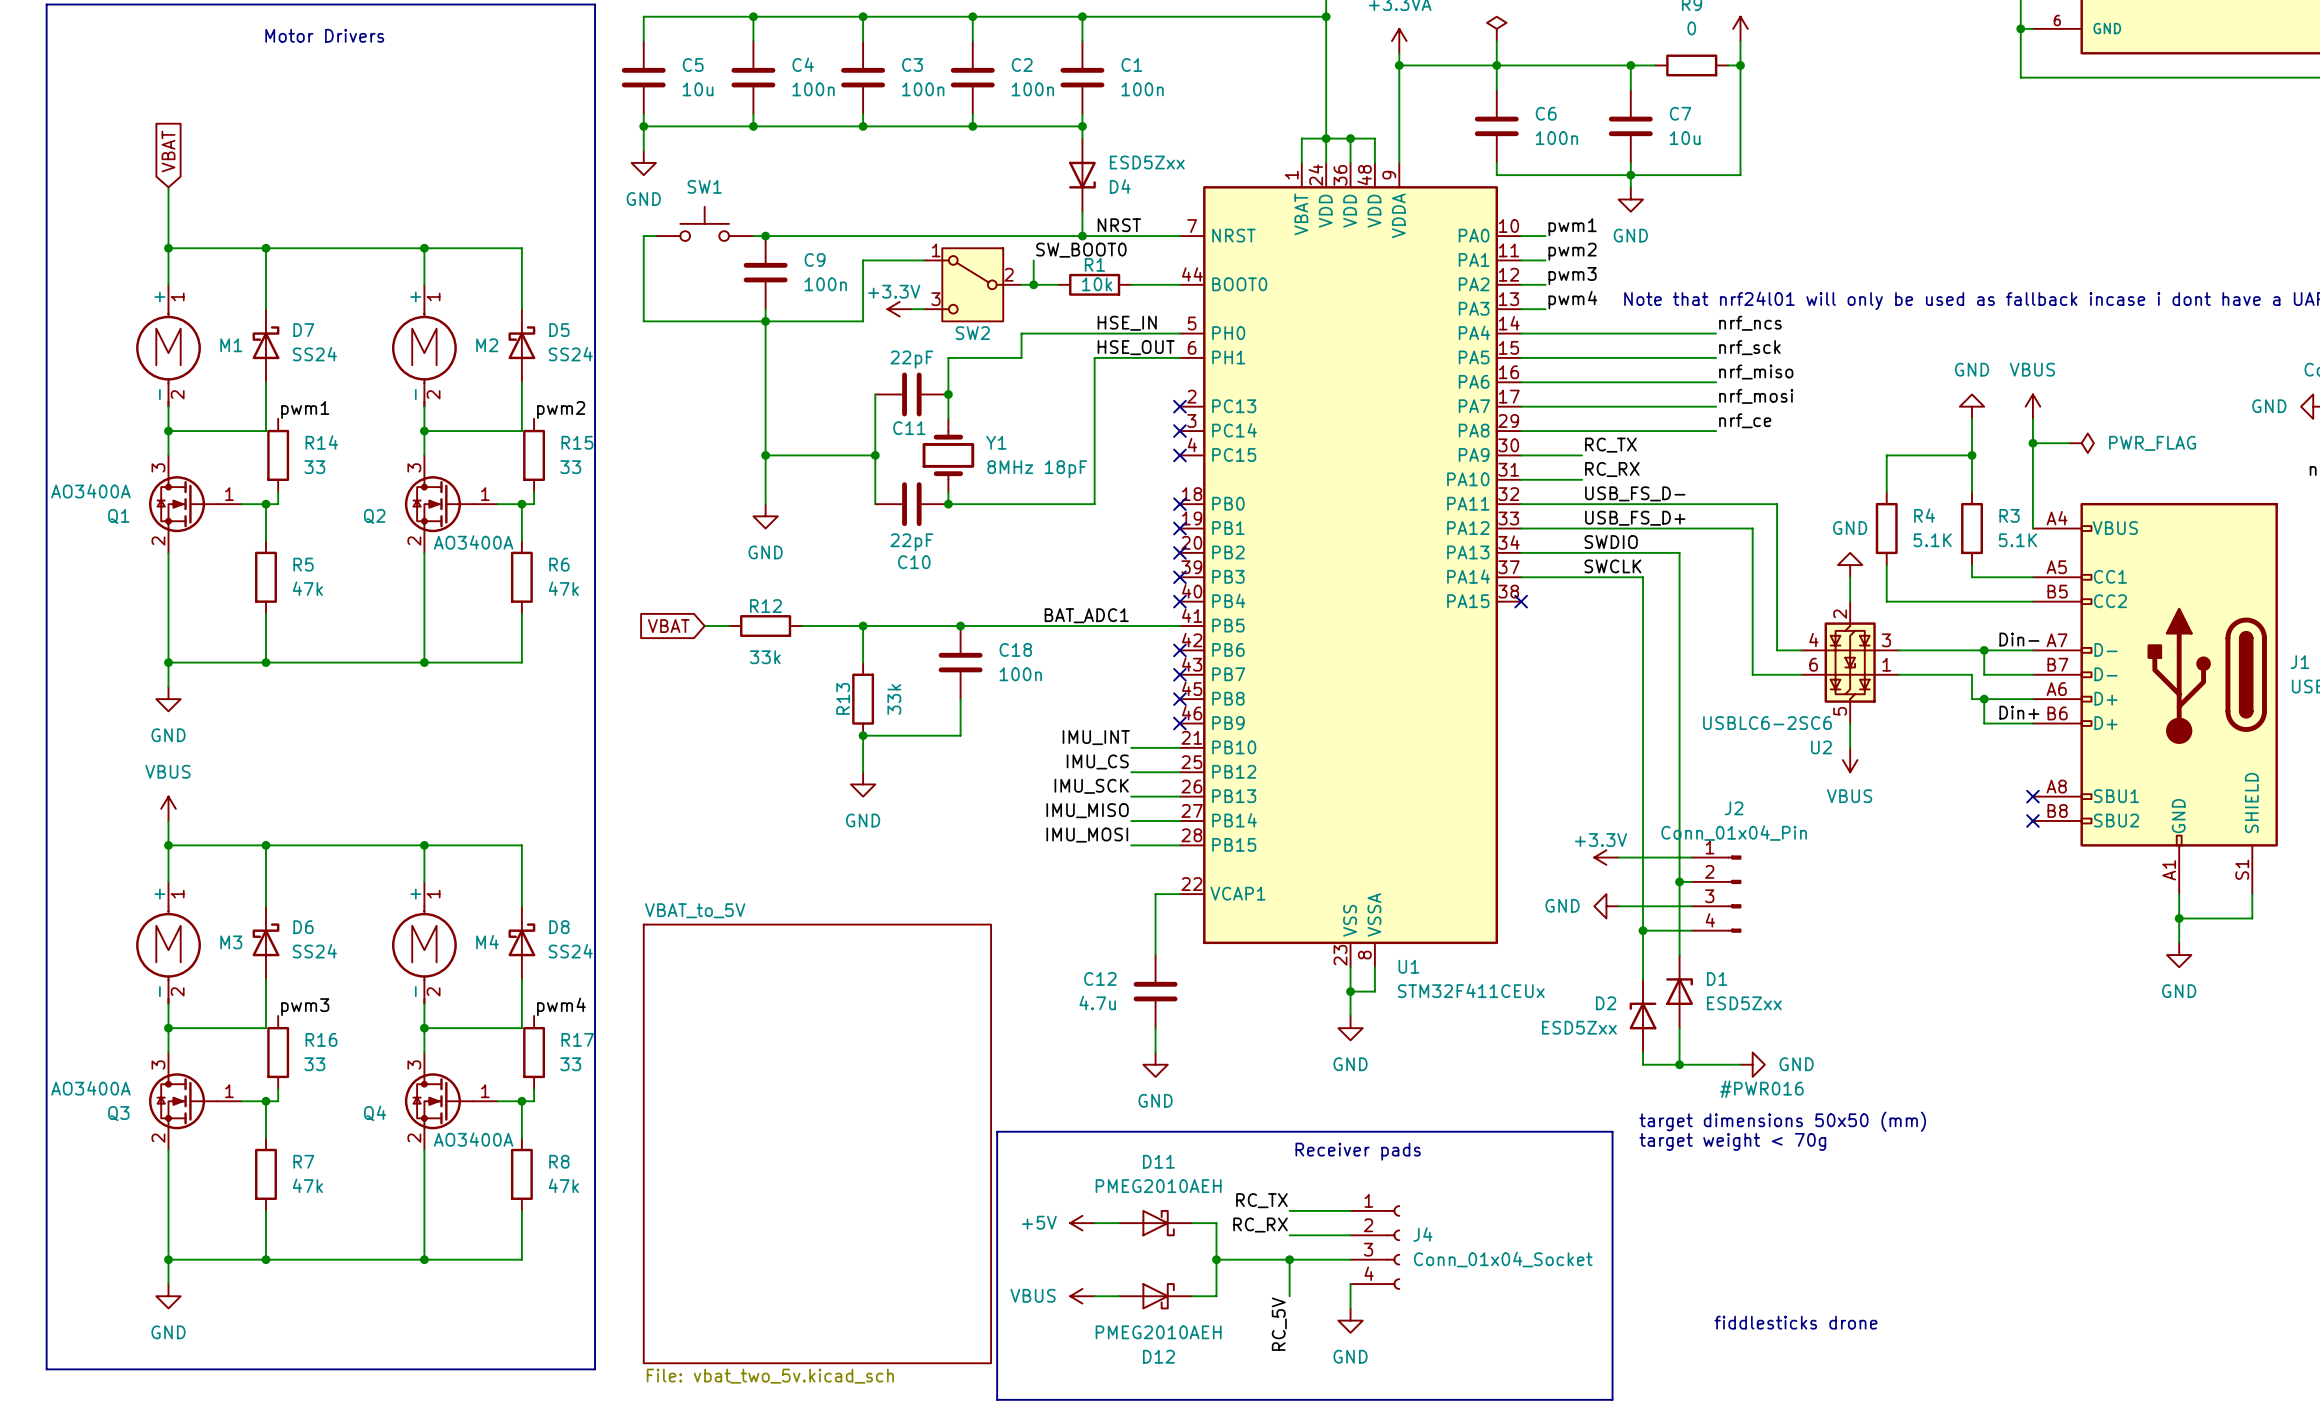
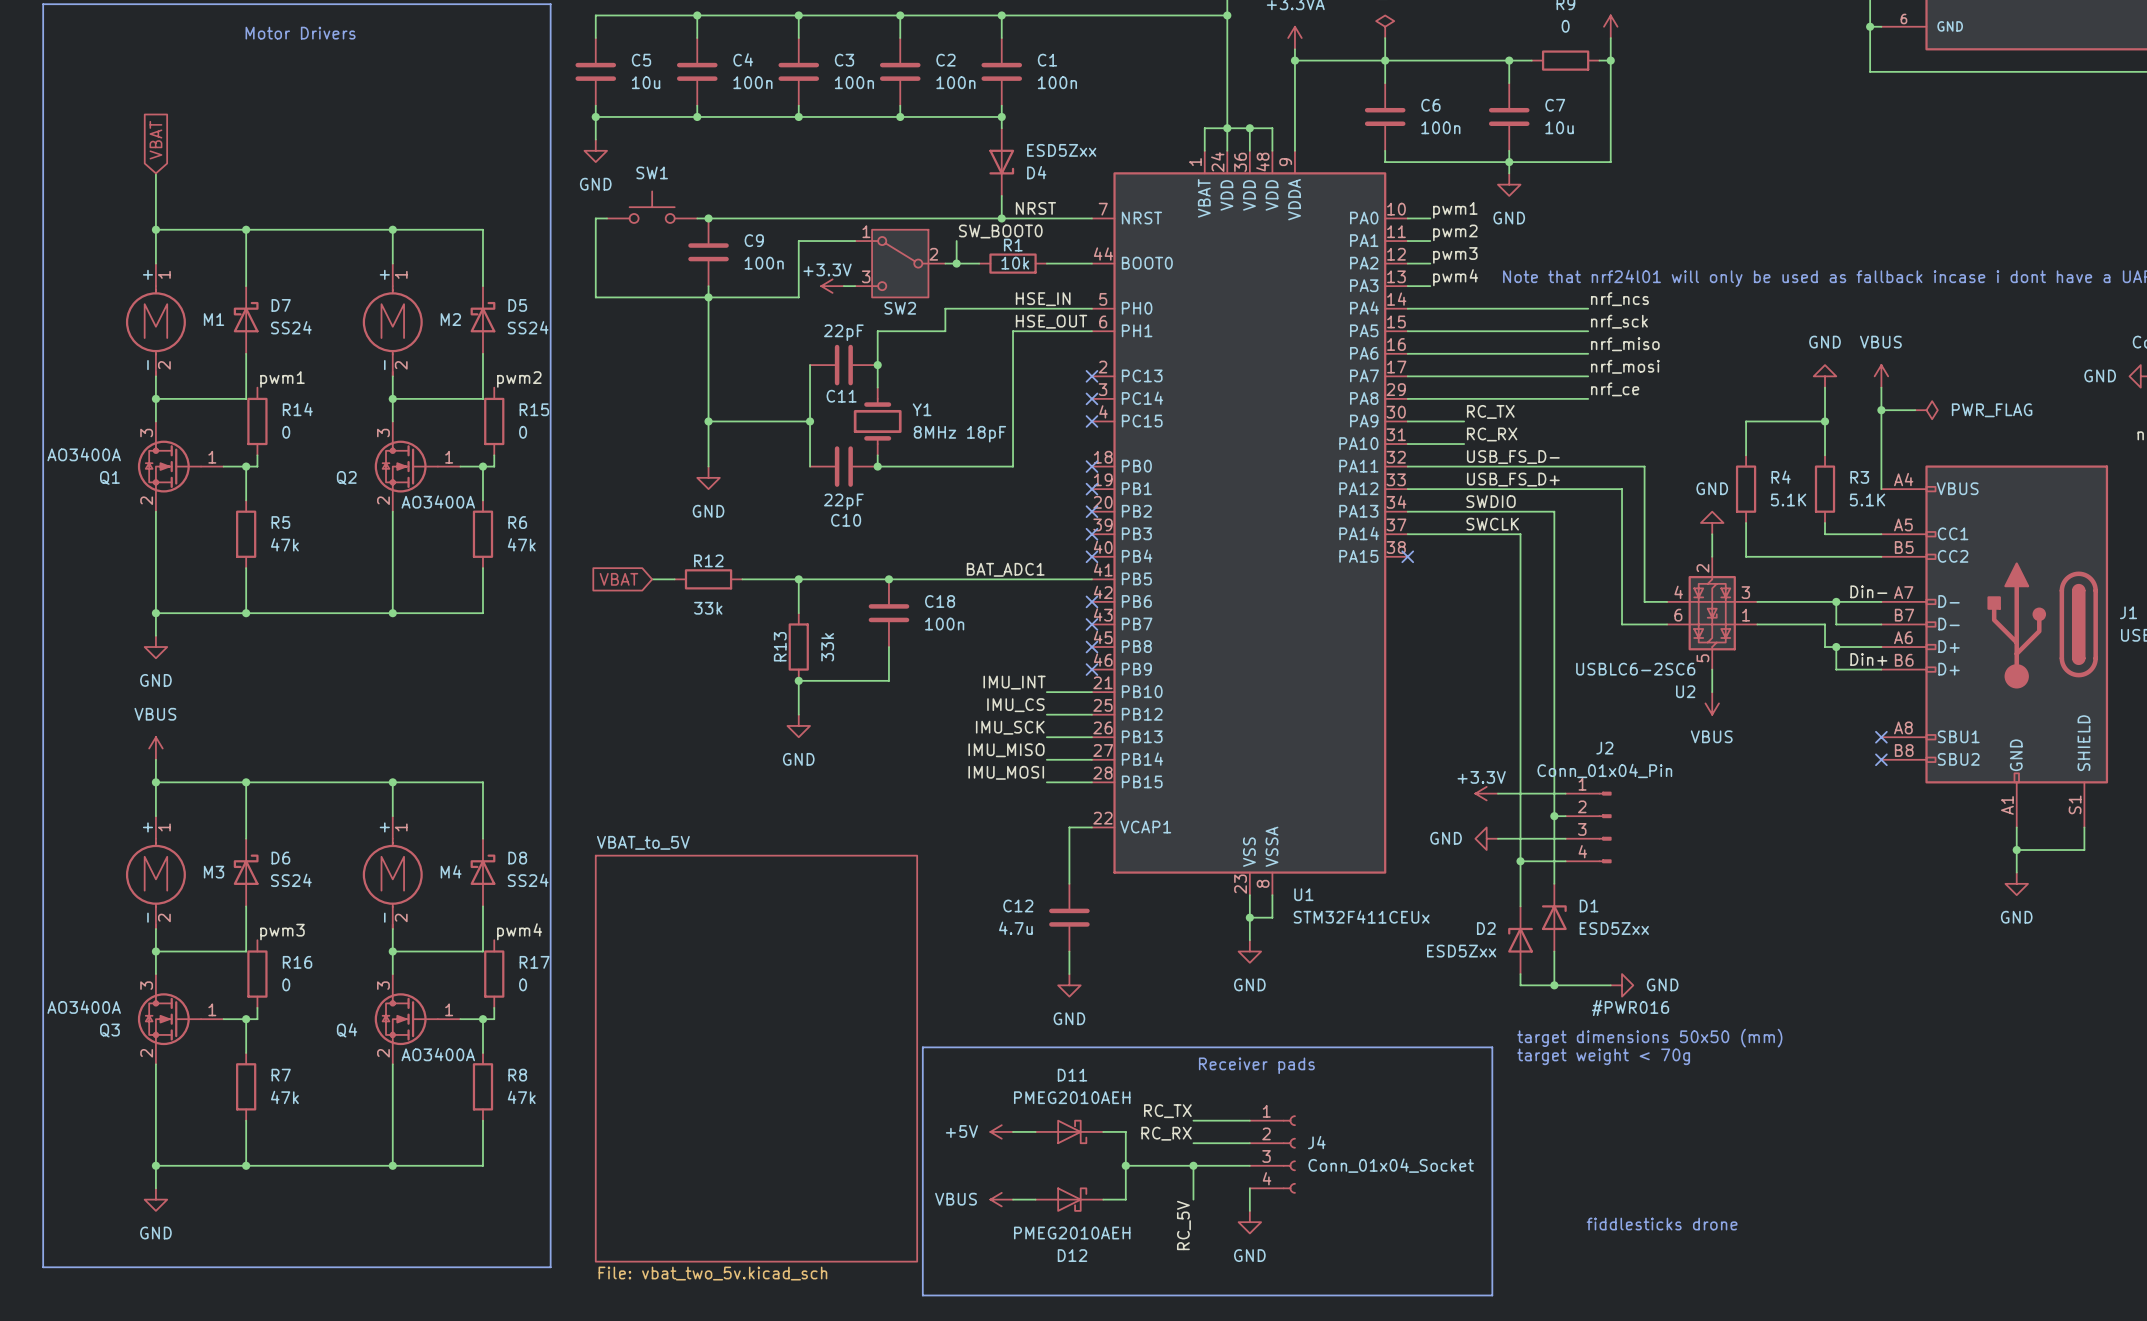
R14 value: 33 (314, 467) -> 0 (286, 432)
R15 value: 33 (570, 467) -> 0 (523, 432)
R16 value: 33 (314, 1064) -> 0 (286, 984)
R17 value: 33 (570, 1064) -> 0 (523, 984)

